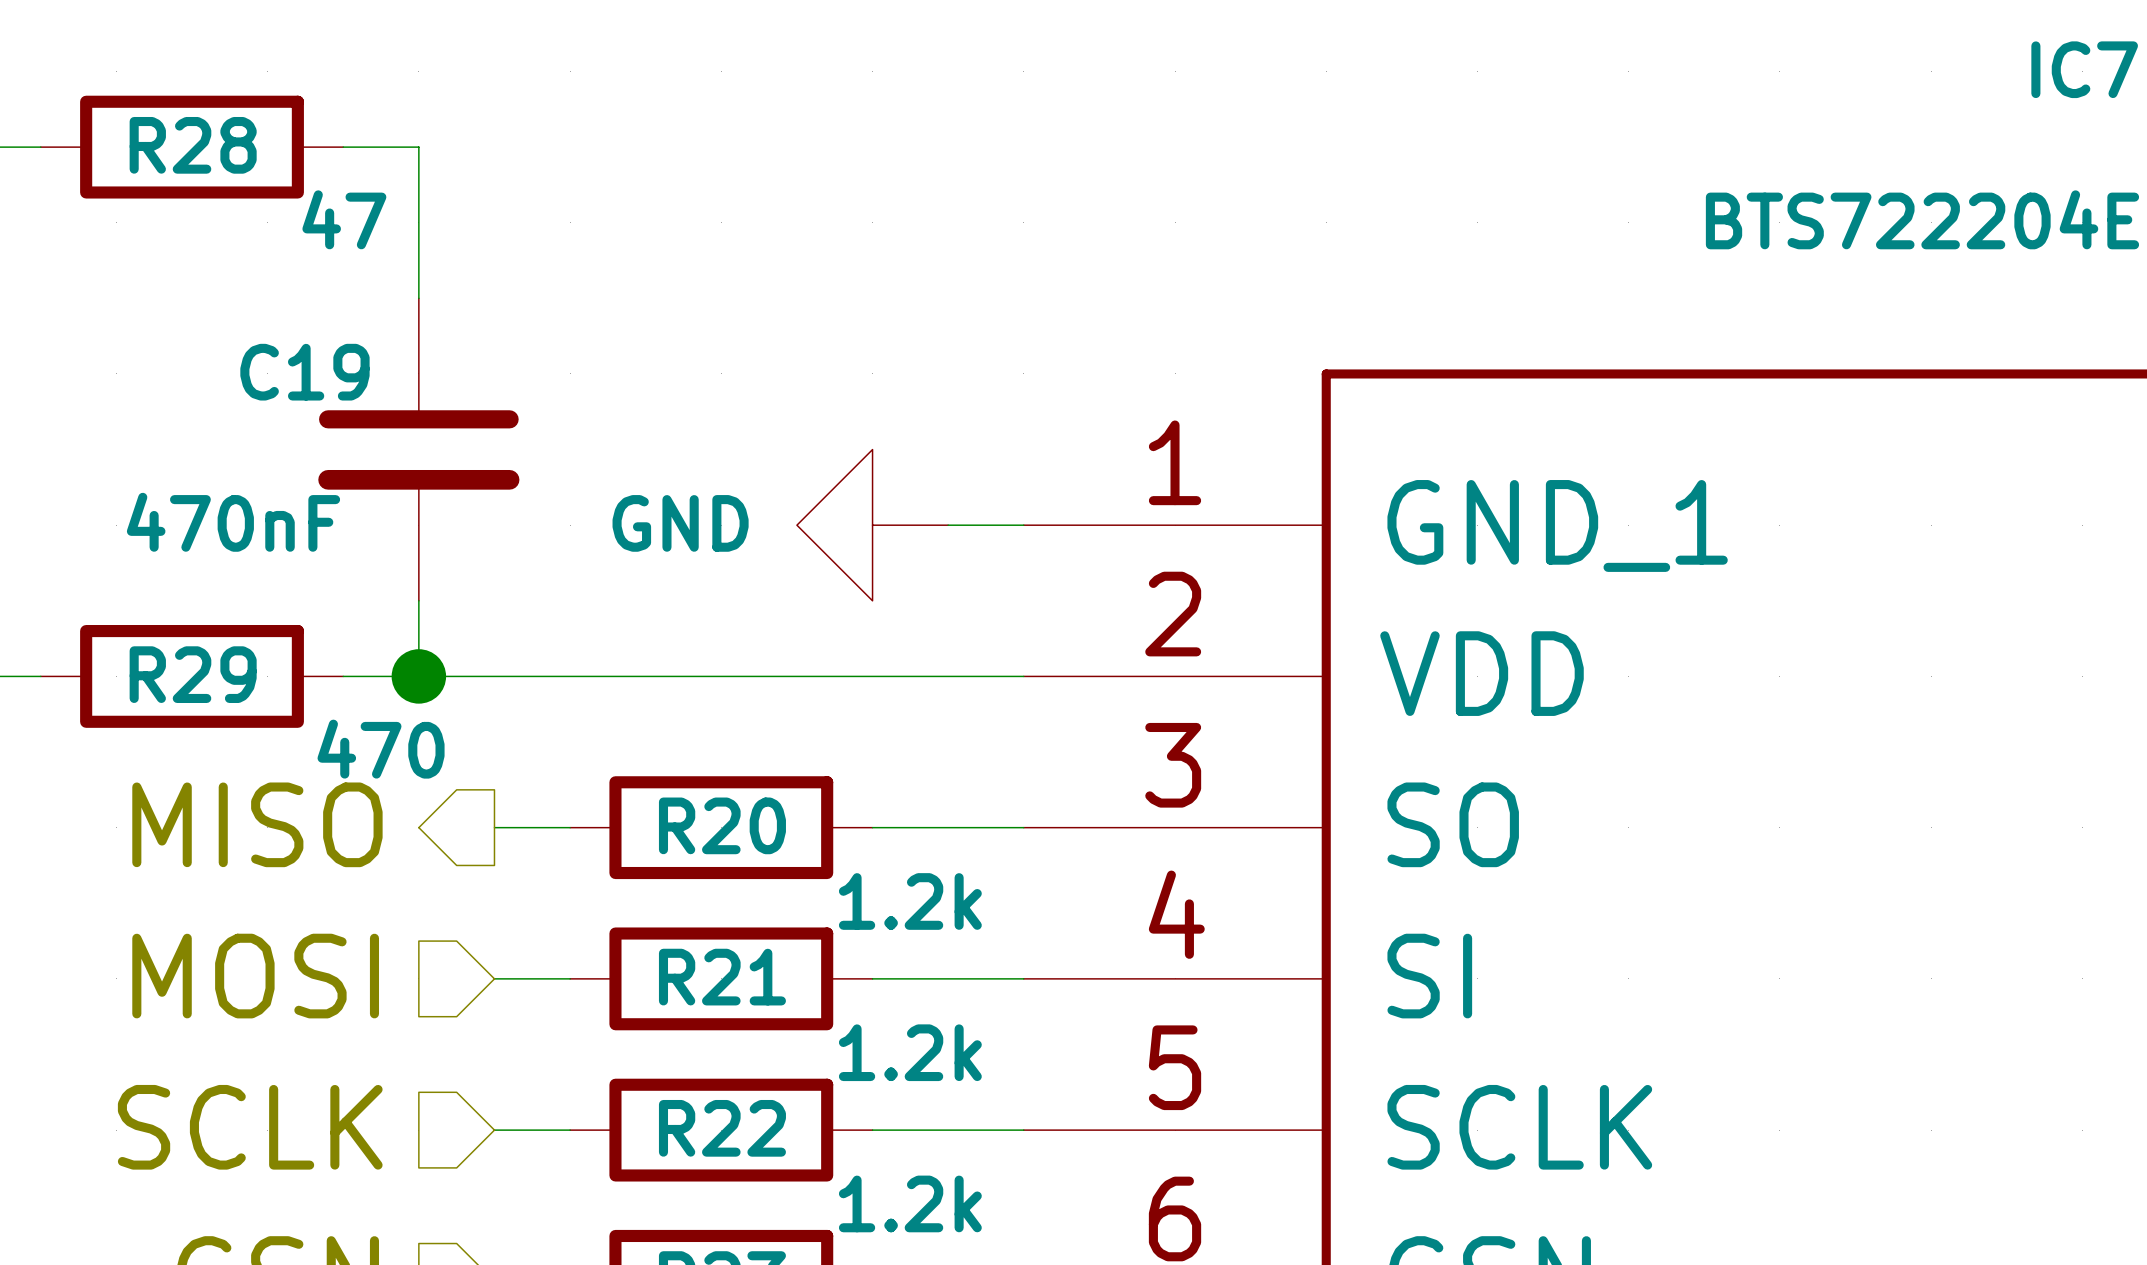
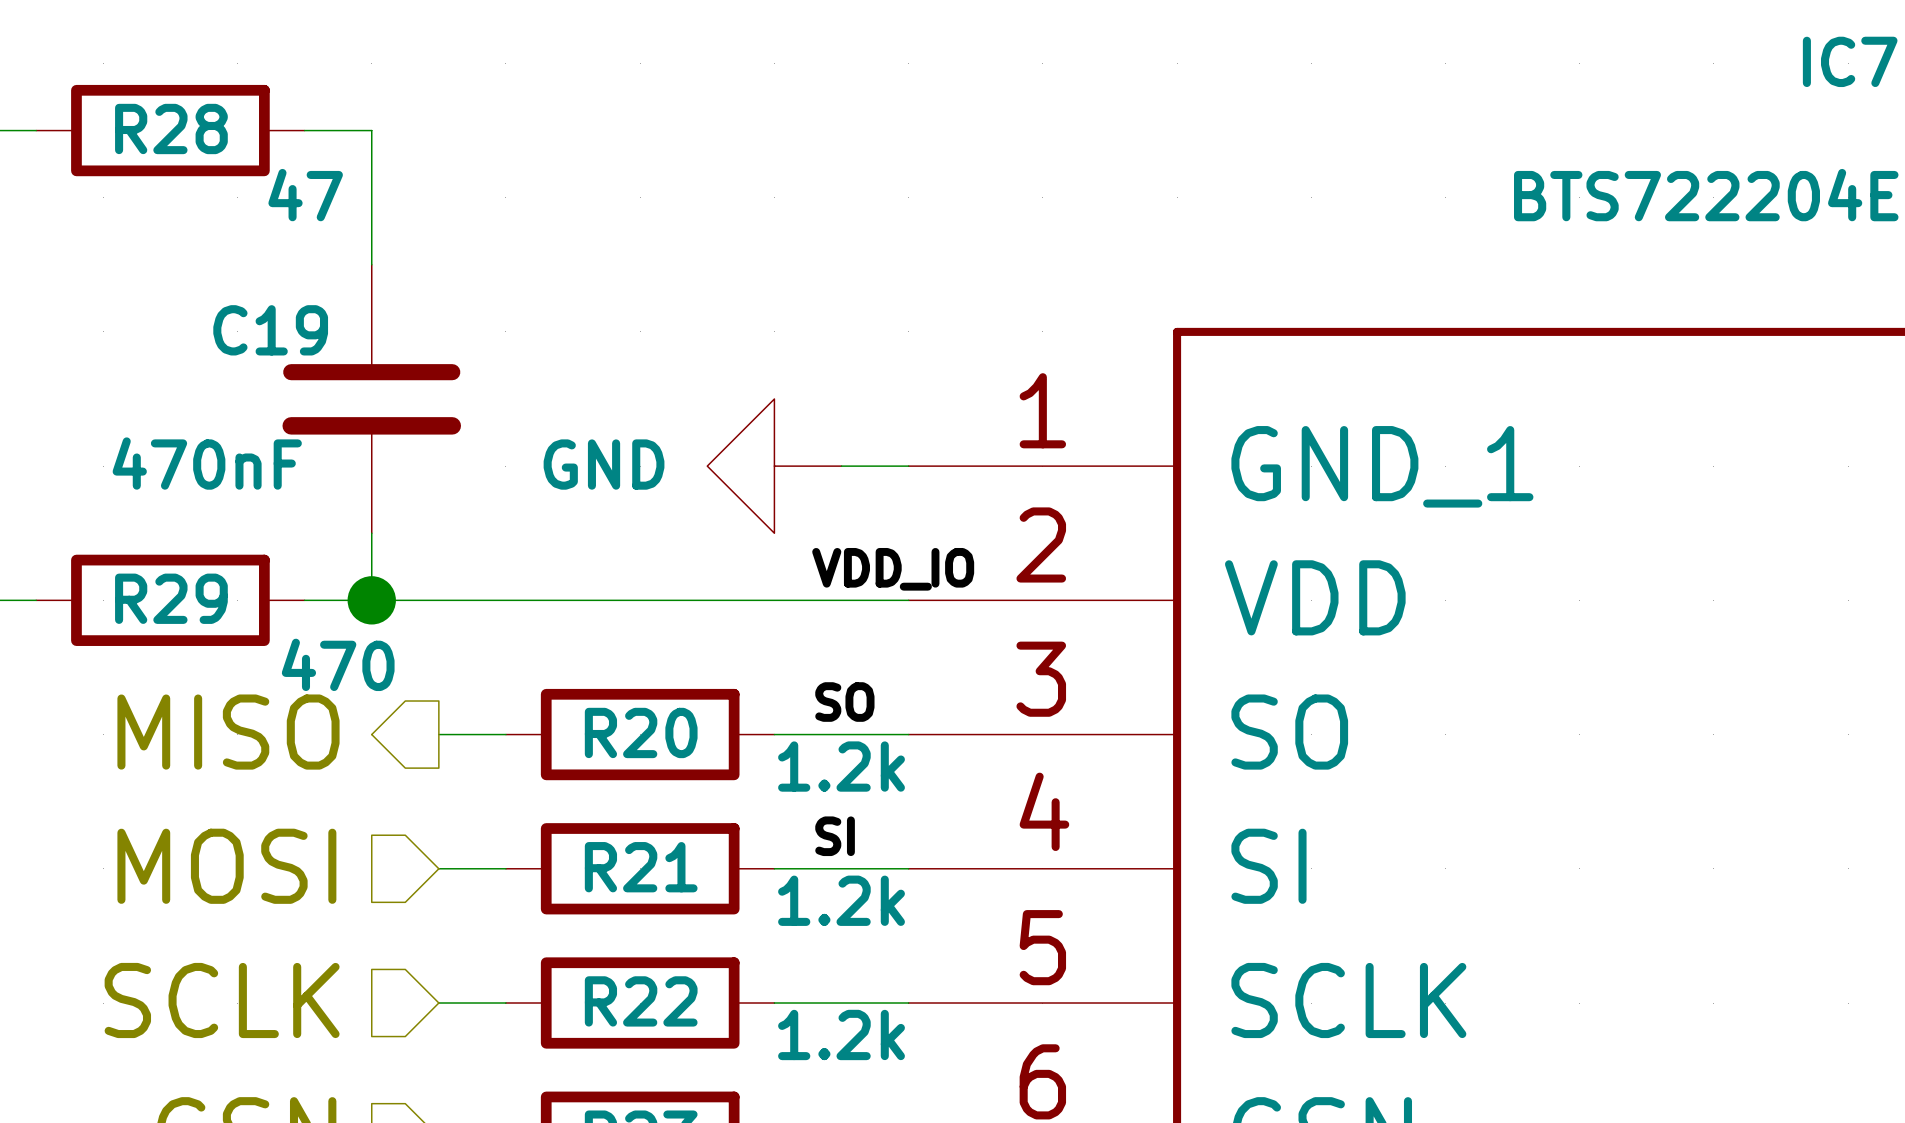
label: none -> VDD_IO (893, 569)
label: none -> SO (844, 702)
R20 value position: 1.2k (910, 901) -> 1.2k (841, 766)
label: none -> SI (835, 836)
R21 value position: 1.2k (910, 1052) -> 1.2k (841, 900)
R22 value position: 1.2k (910, 1203) -> 1.2k (841, 1034)

